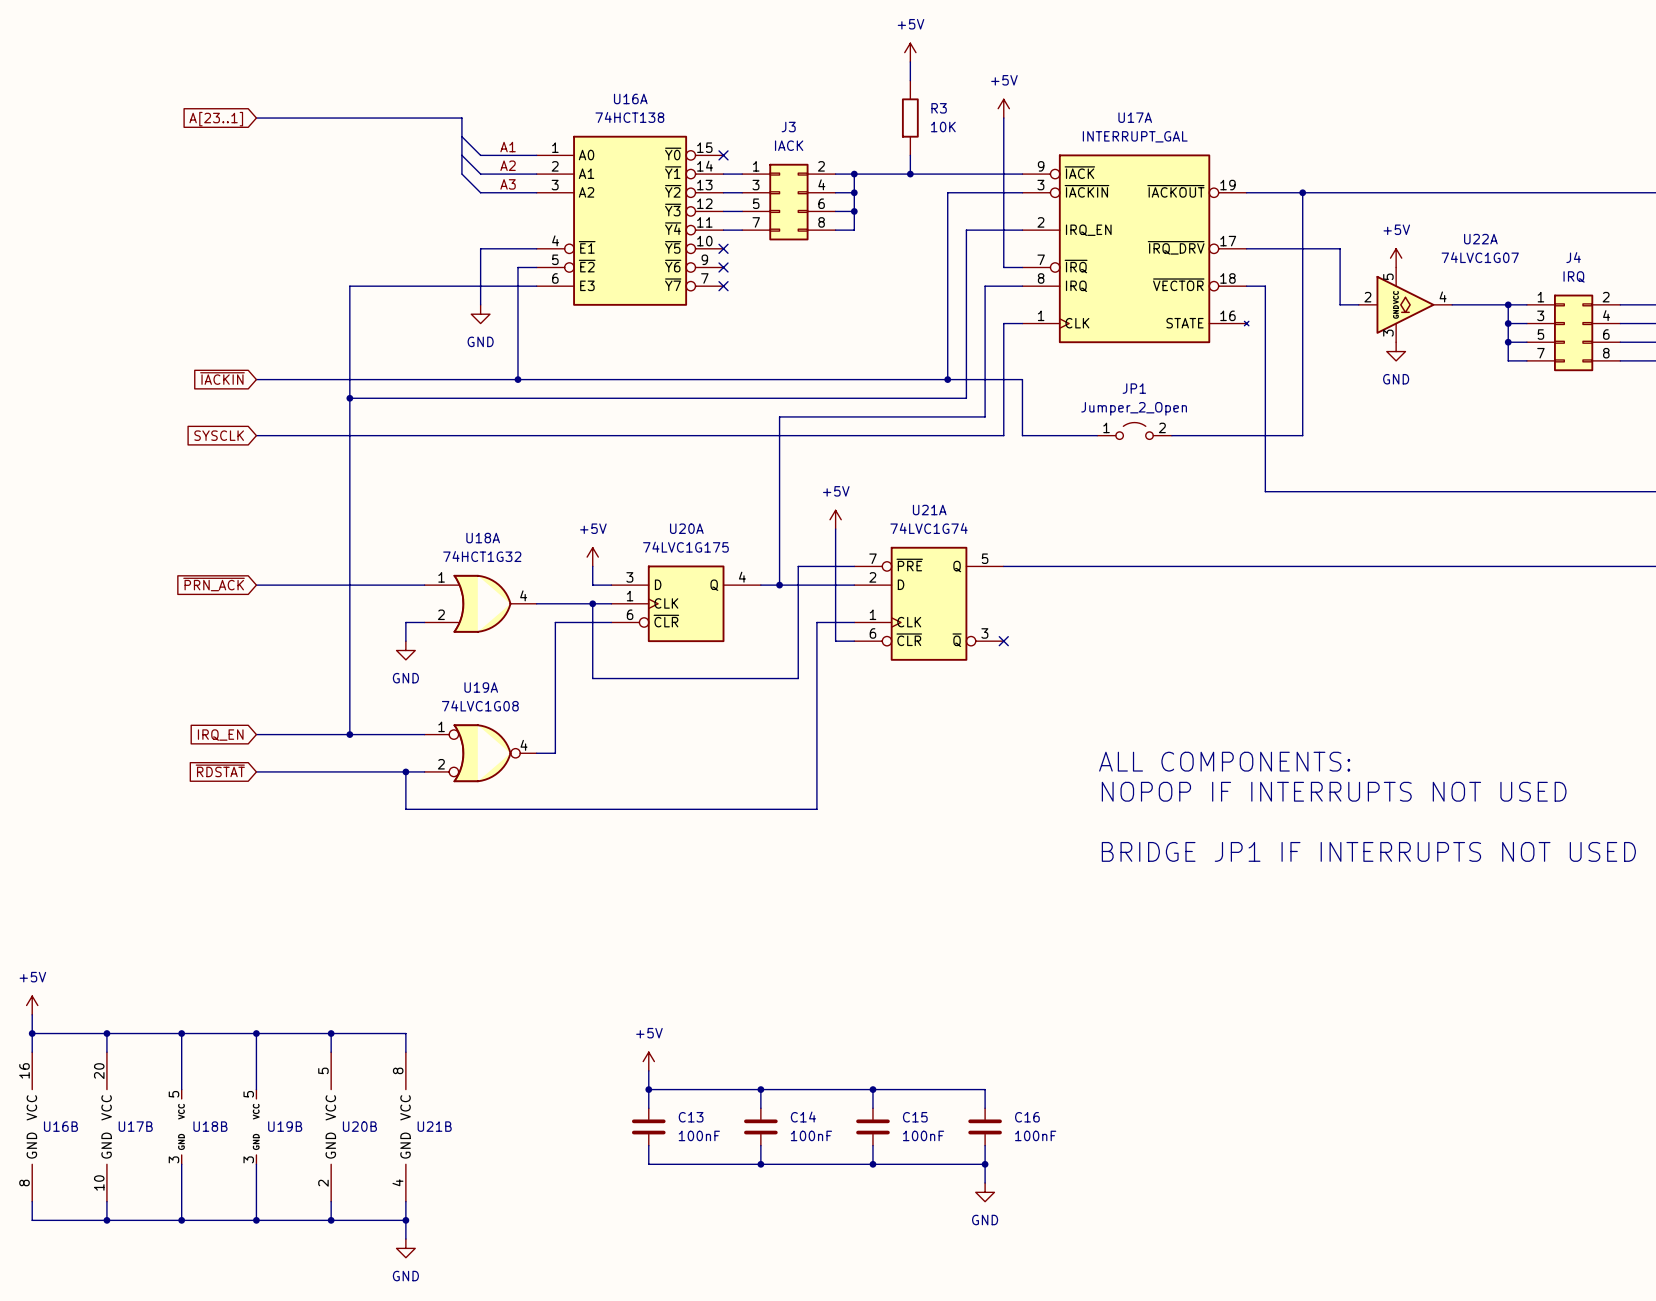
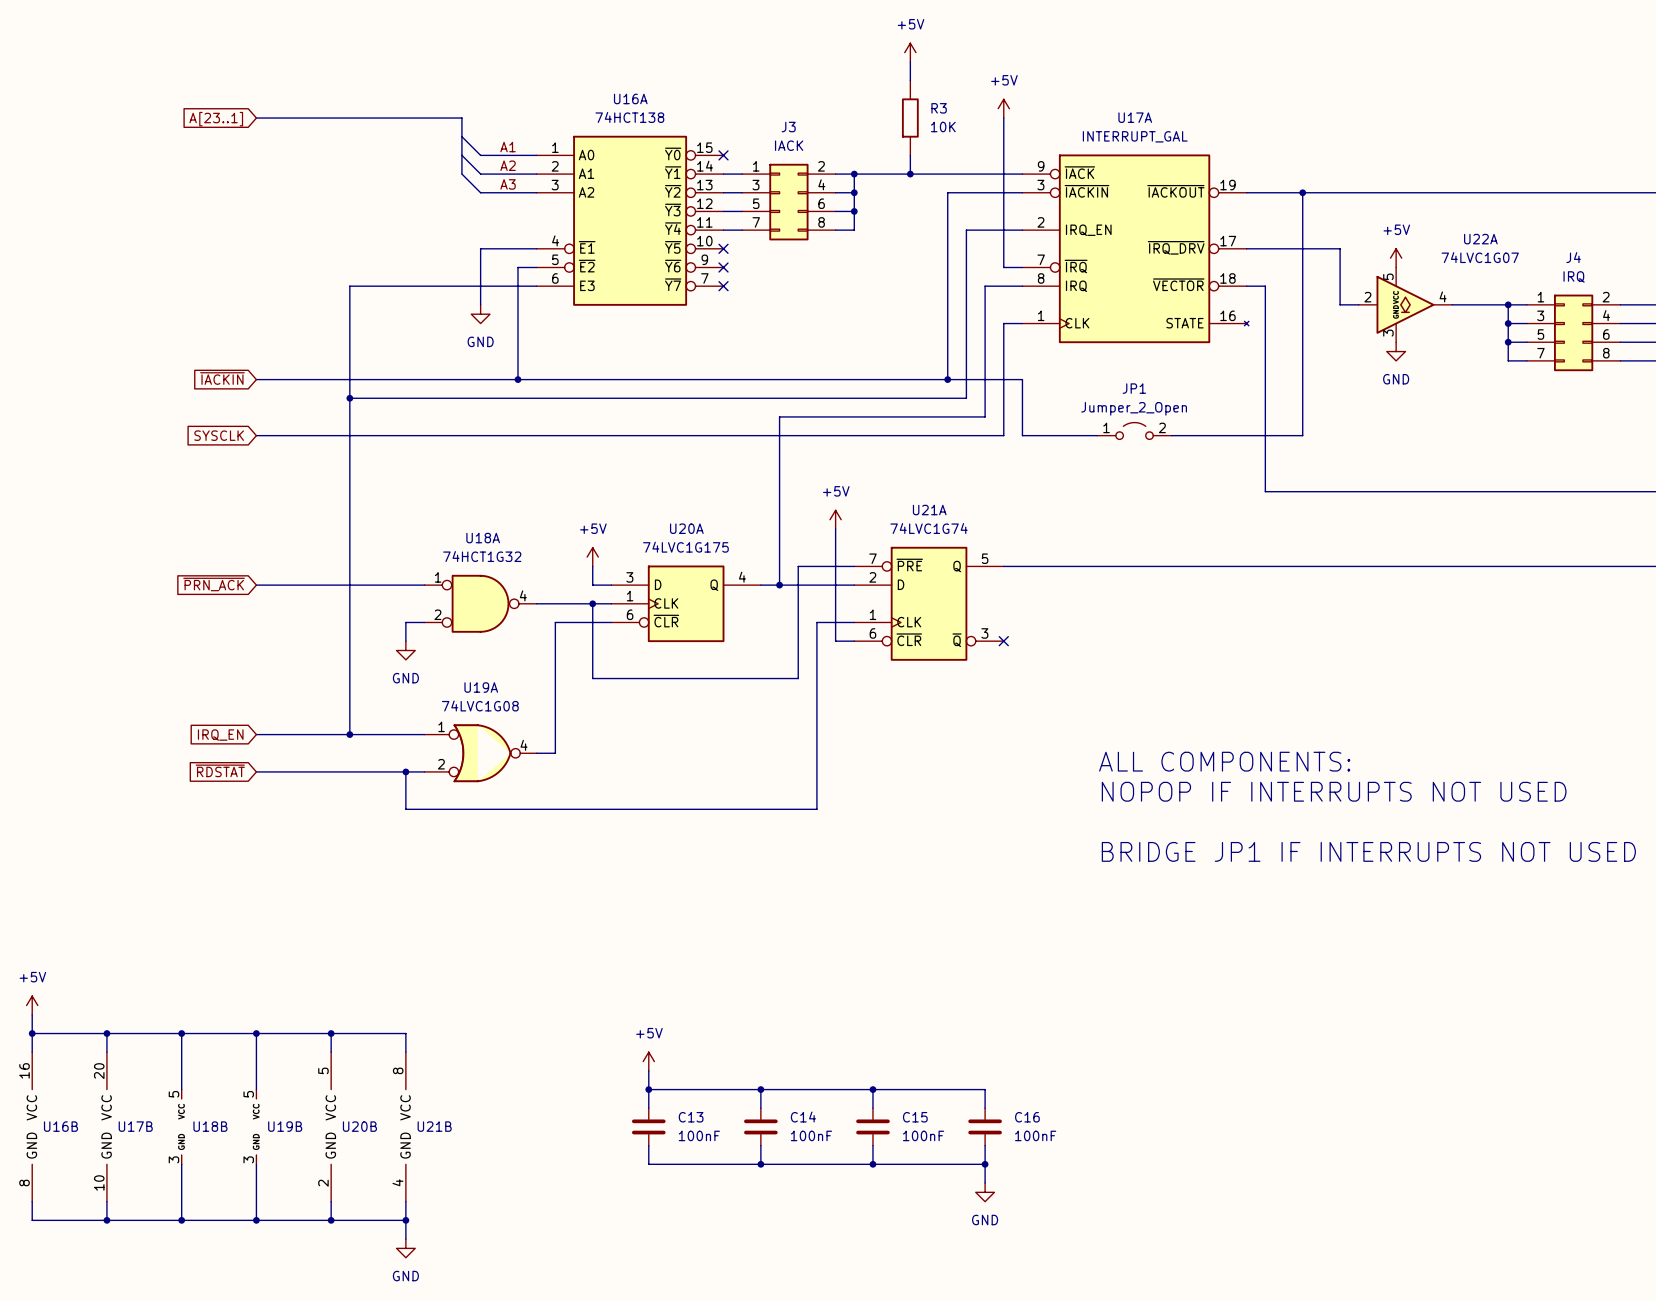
U18A symbol: [424, 574, 537, 633] -> [424, 574, 537, 633]

